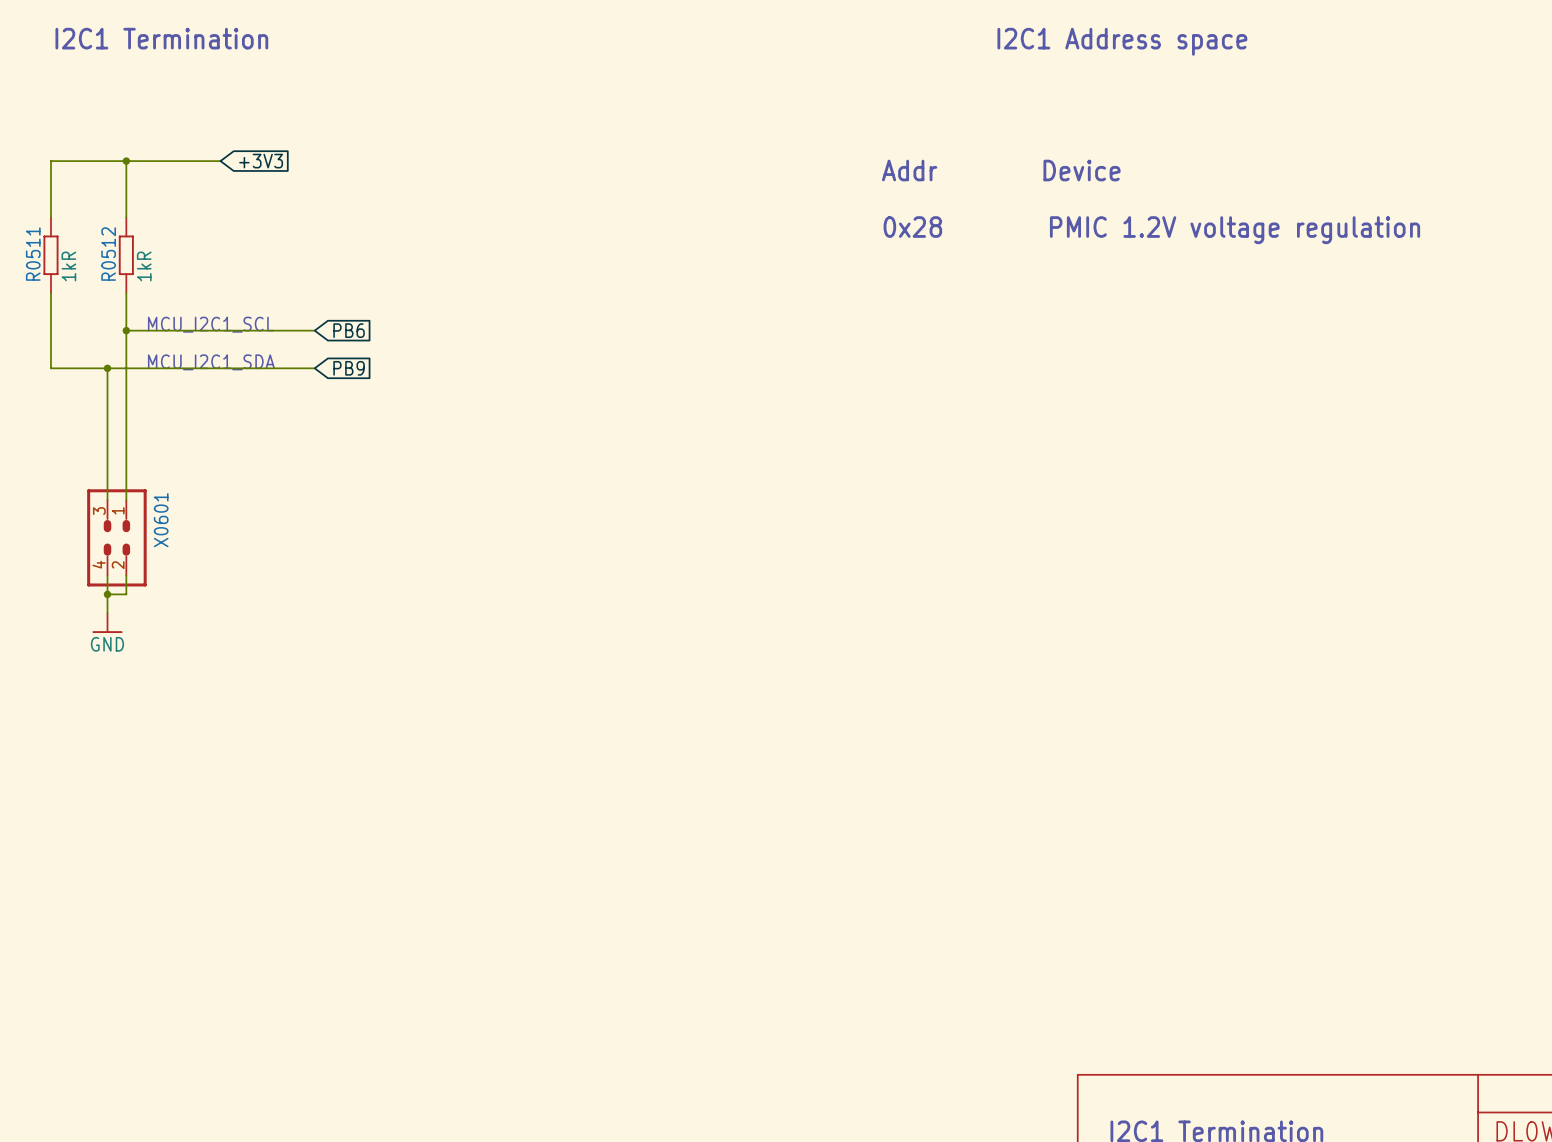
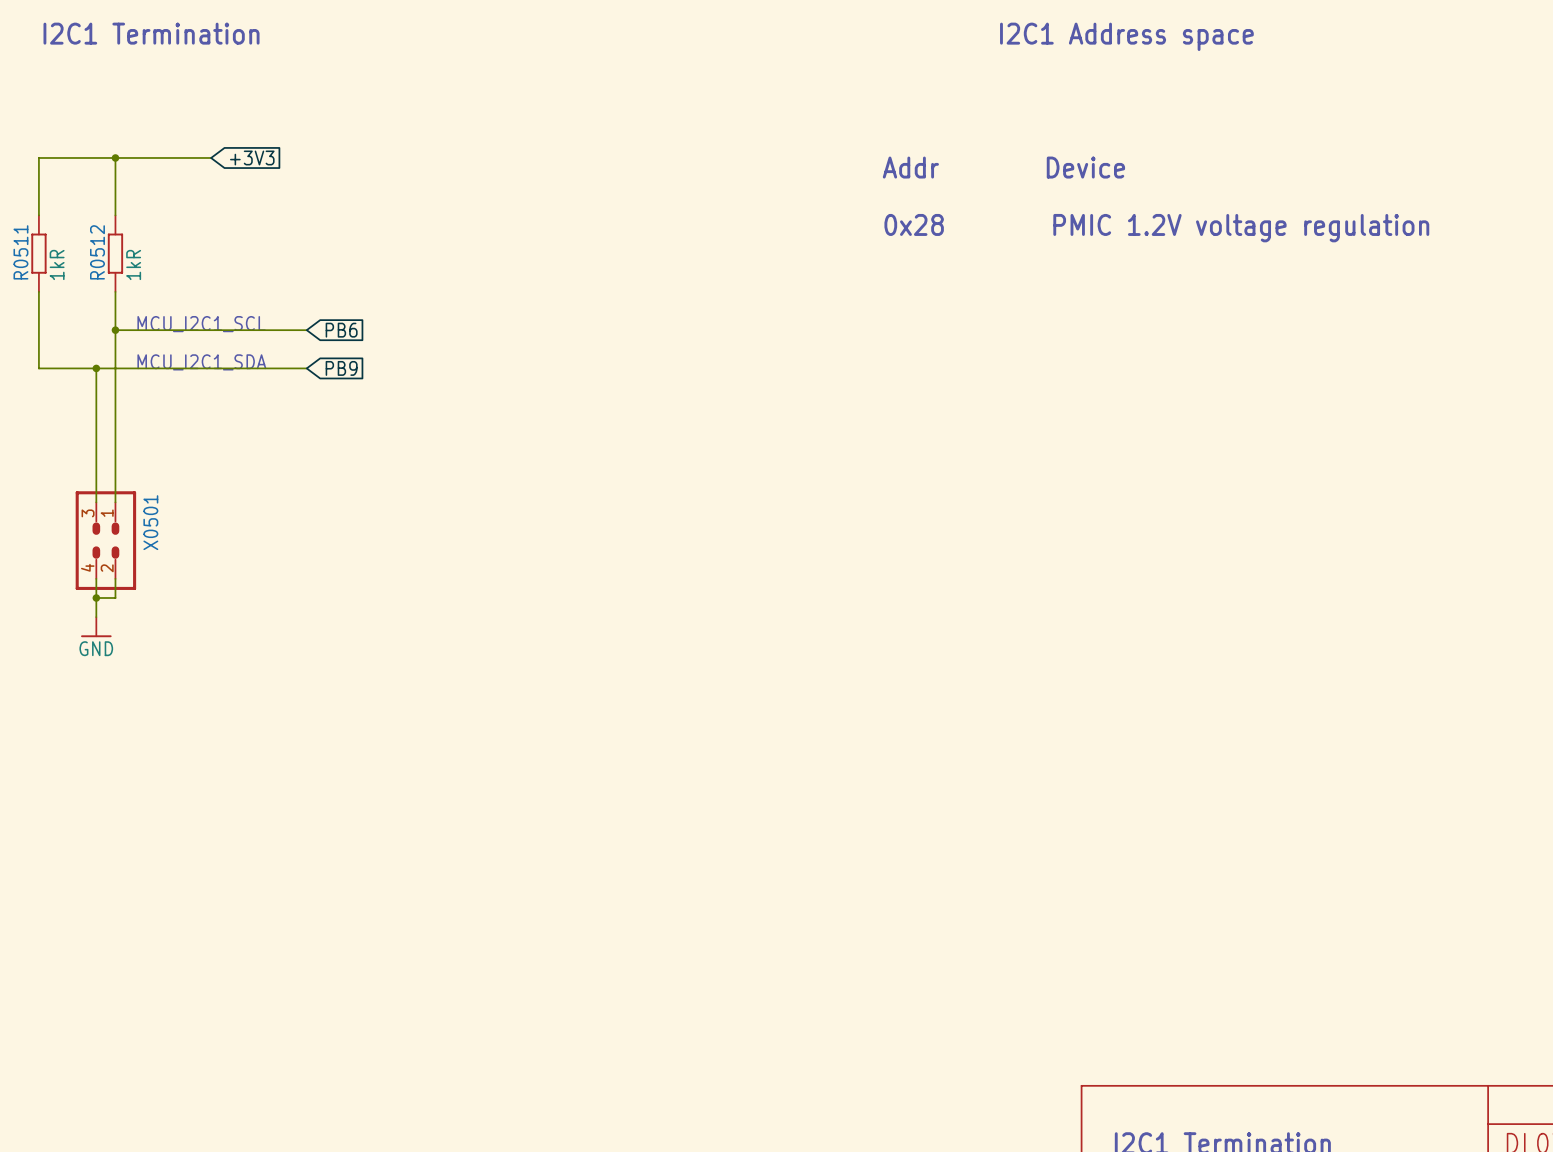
X0601 name: X0601 (161, 520) -> X0501 (150, 522)

